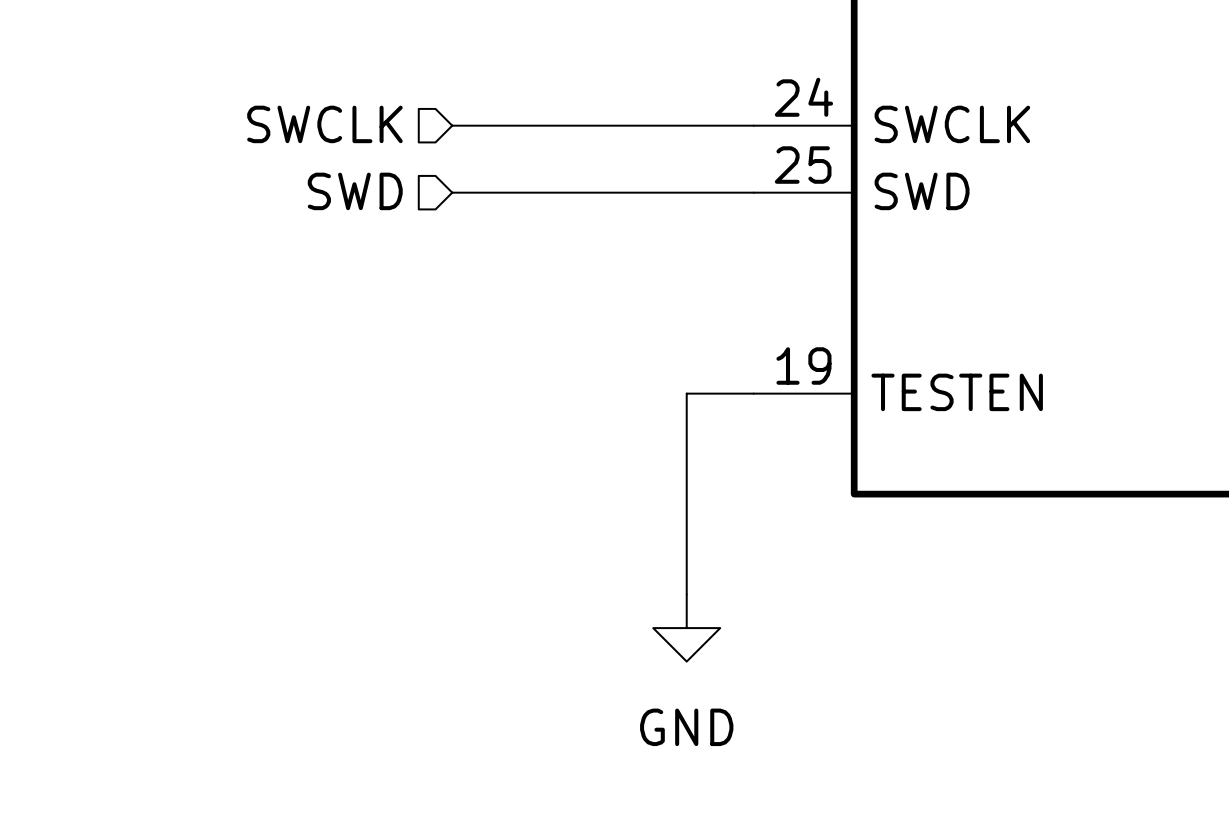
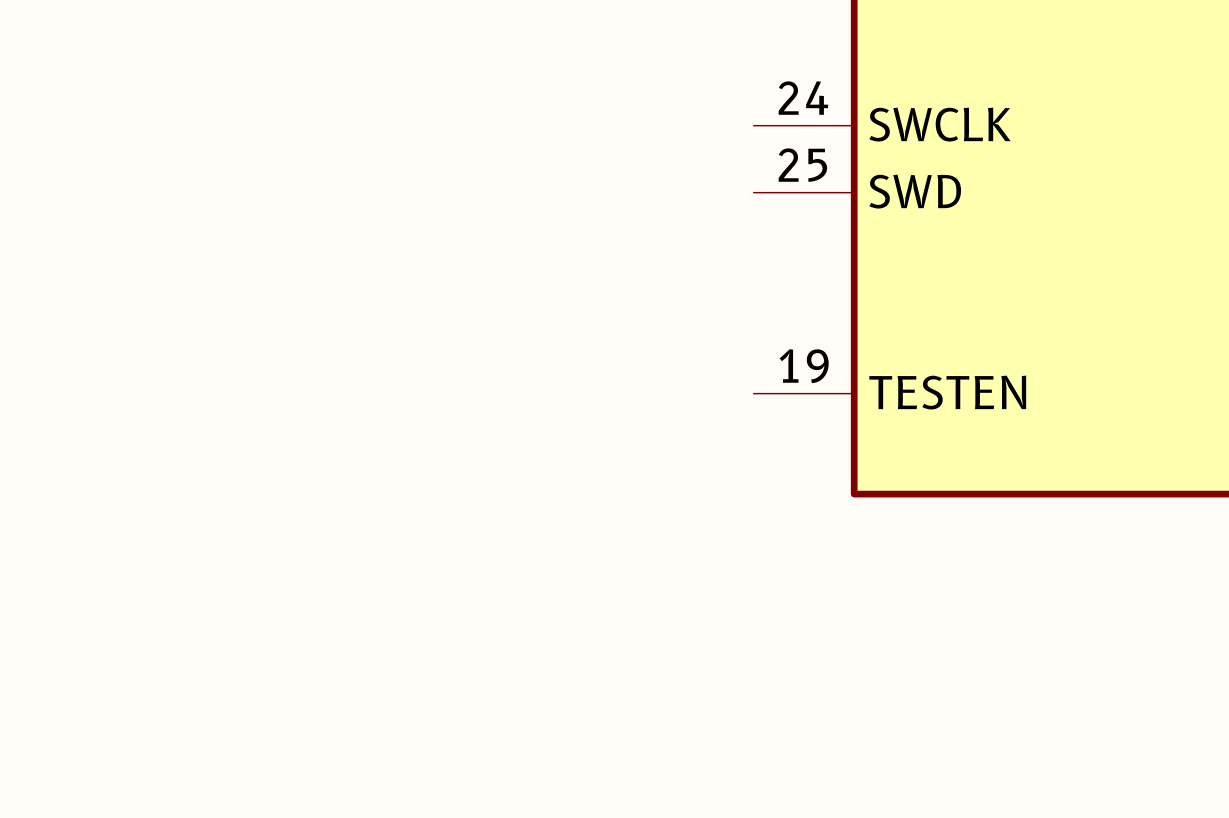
hierarchical label: SWCLK (324, 124) -> none
wire: (452, 125) (753, 125) -> none
hierarchical label: SWD (355, 191) -> none
wire: (452, 192) (753, 192) -> none
wire: (753, 393) (686, 393) (686, 594) -> none
power symbol: GND (686, 628) -> none

